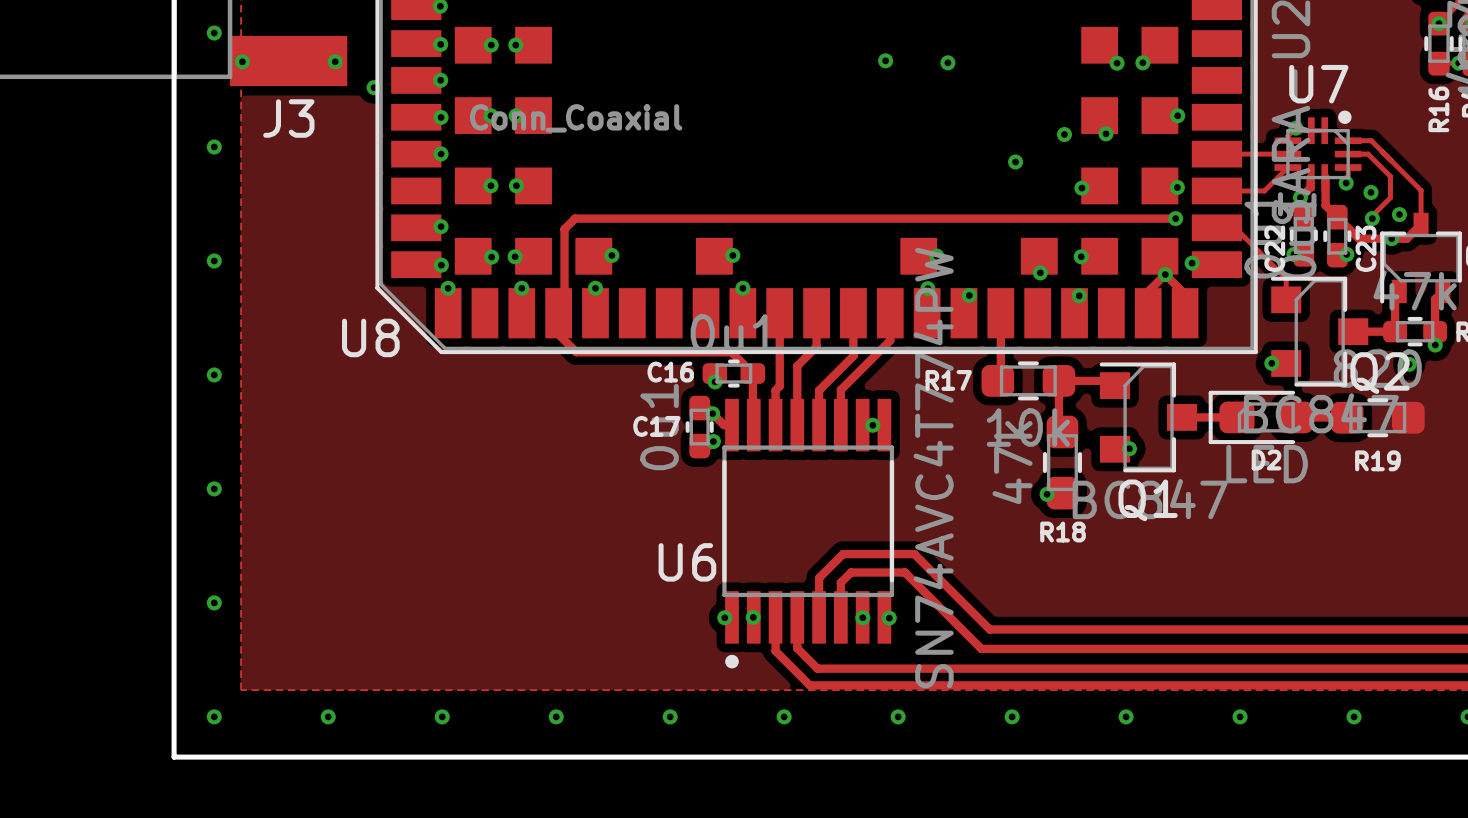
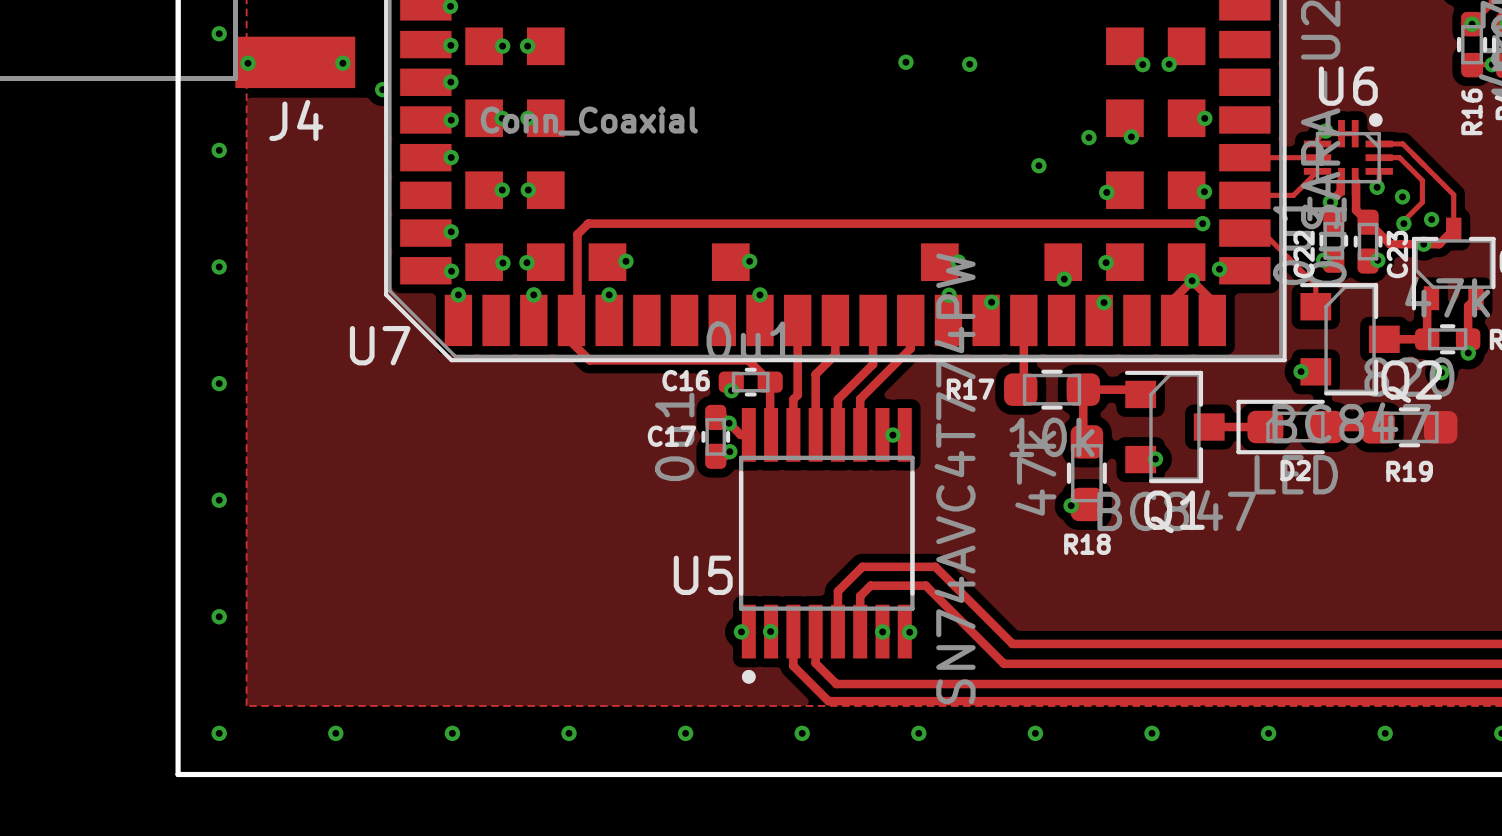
U7 name: U7 (1318, 84) -> U6 (1348, 86)
J3 name: J3 (288, 118) -> J4 (296, 120)
U8 name: U8 (370, 337) -> U7 (380, 345)
U6 name: U6 (687, 562) -> U5 (703, 575)

